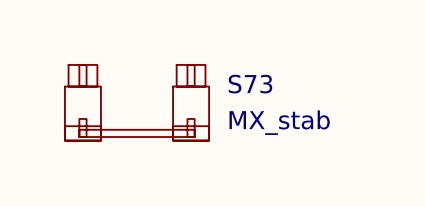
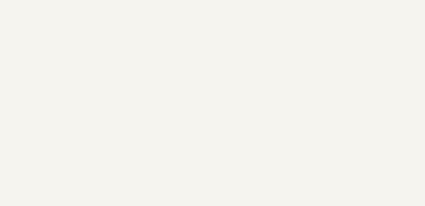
S73: MX_stab (137, 102) -> none

